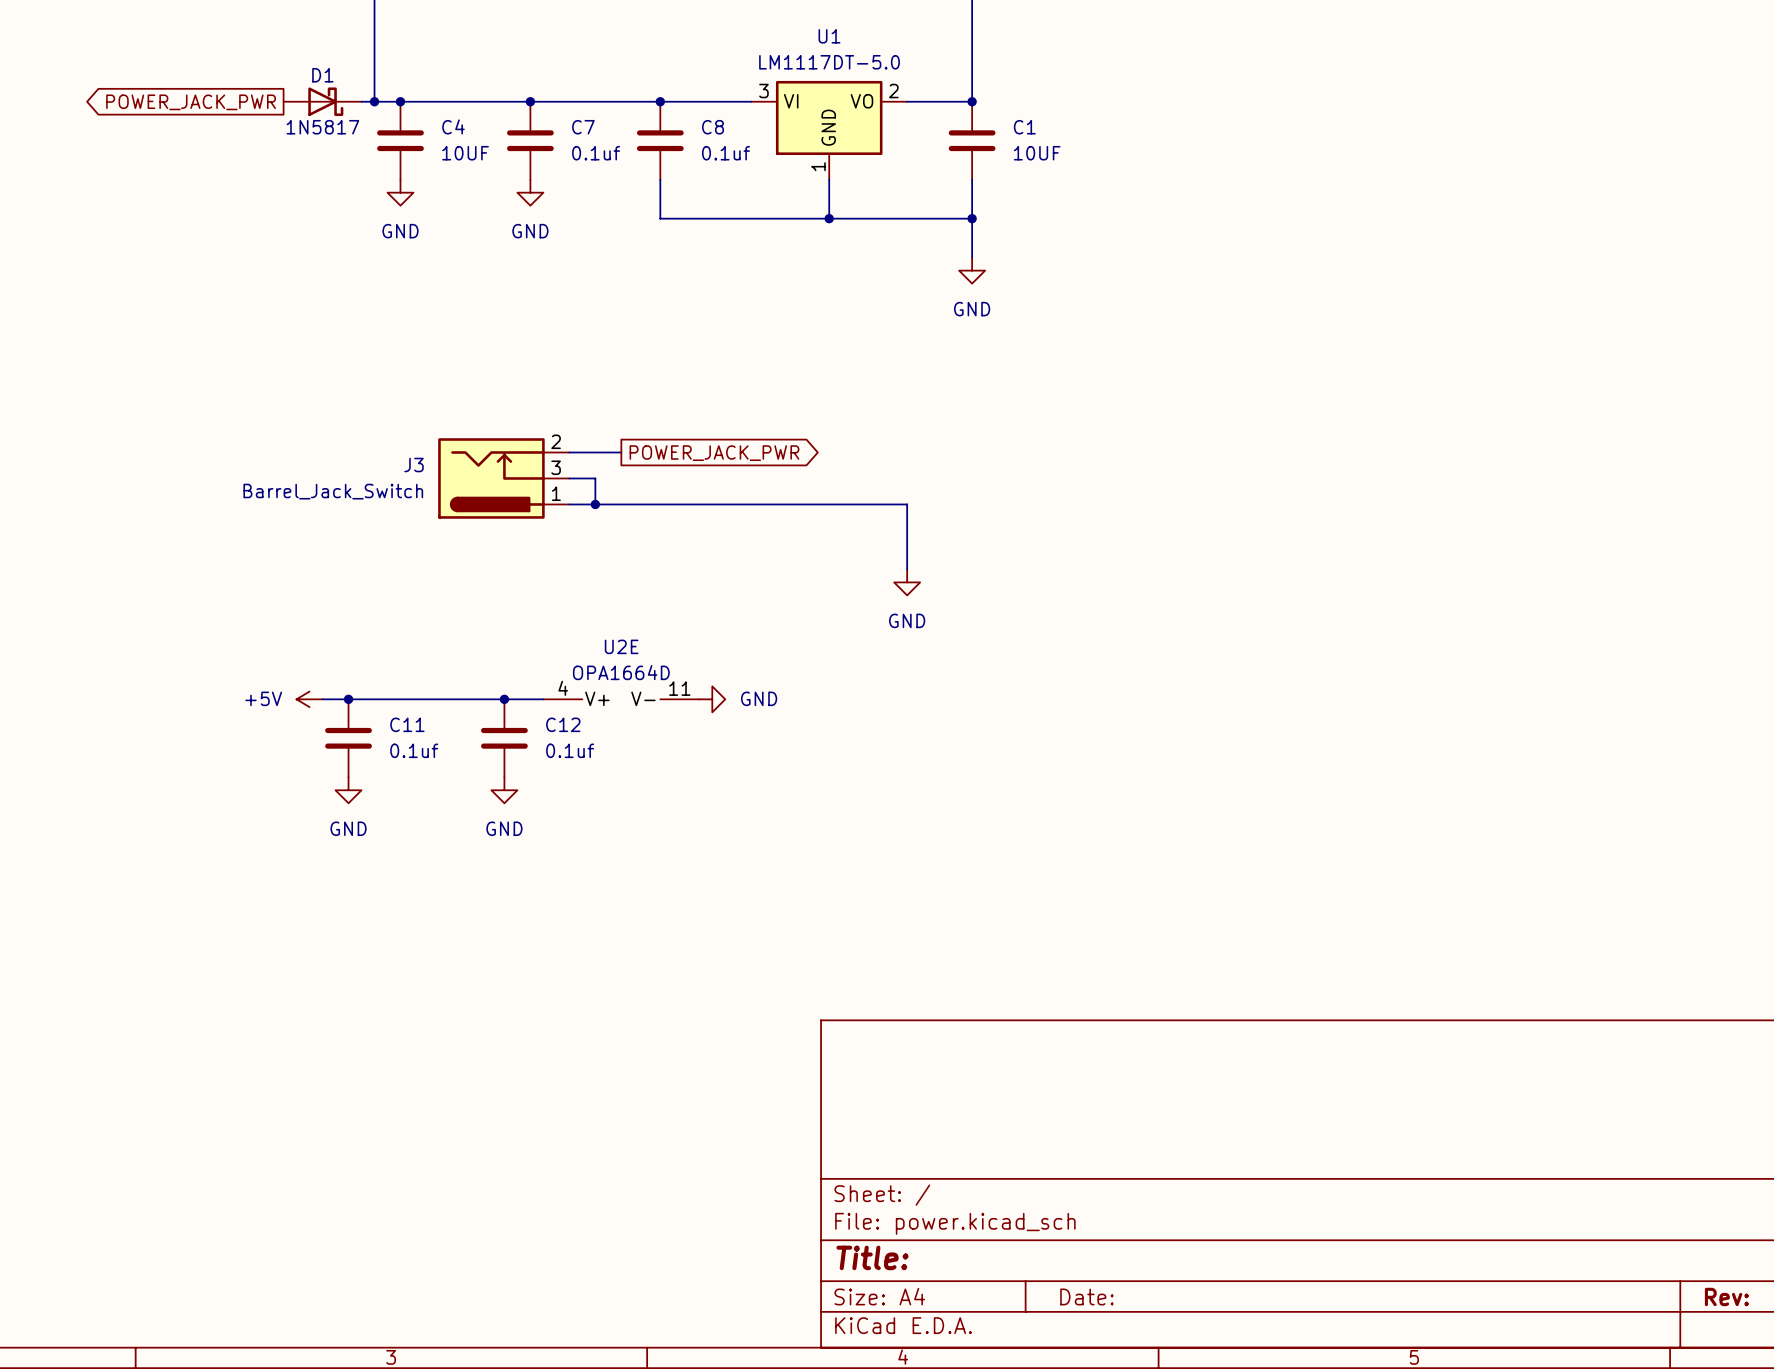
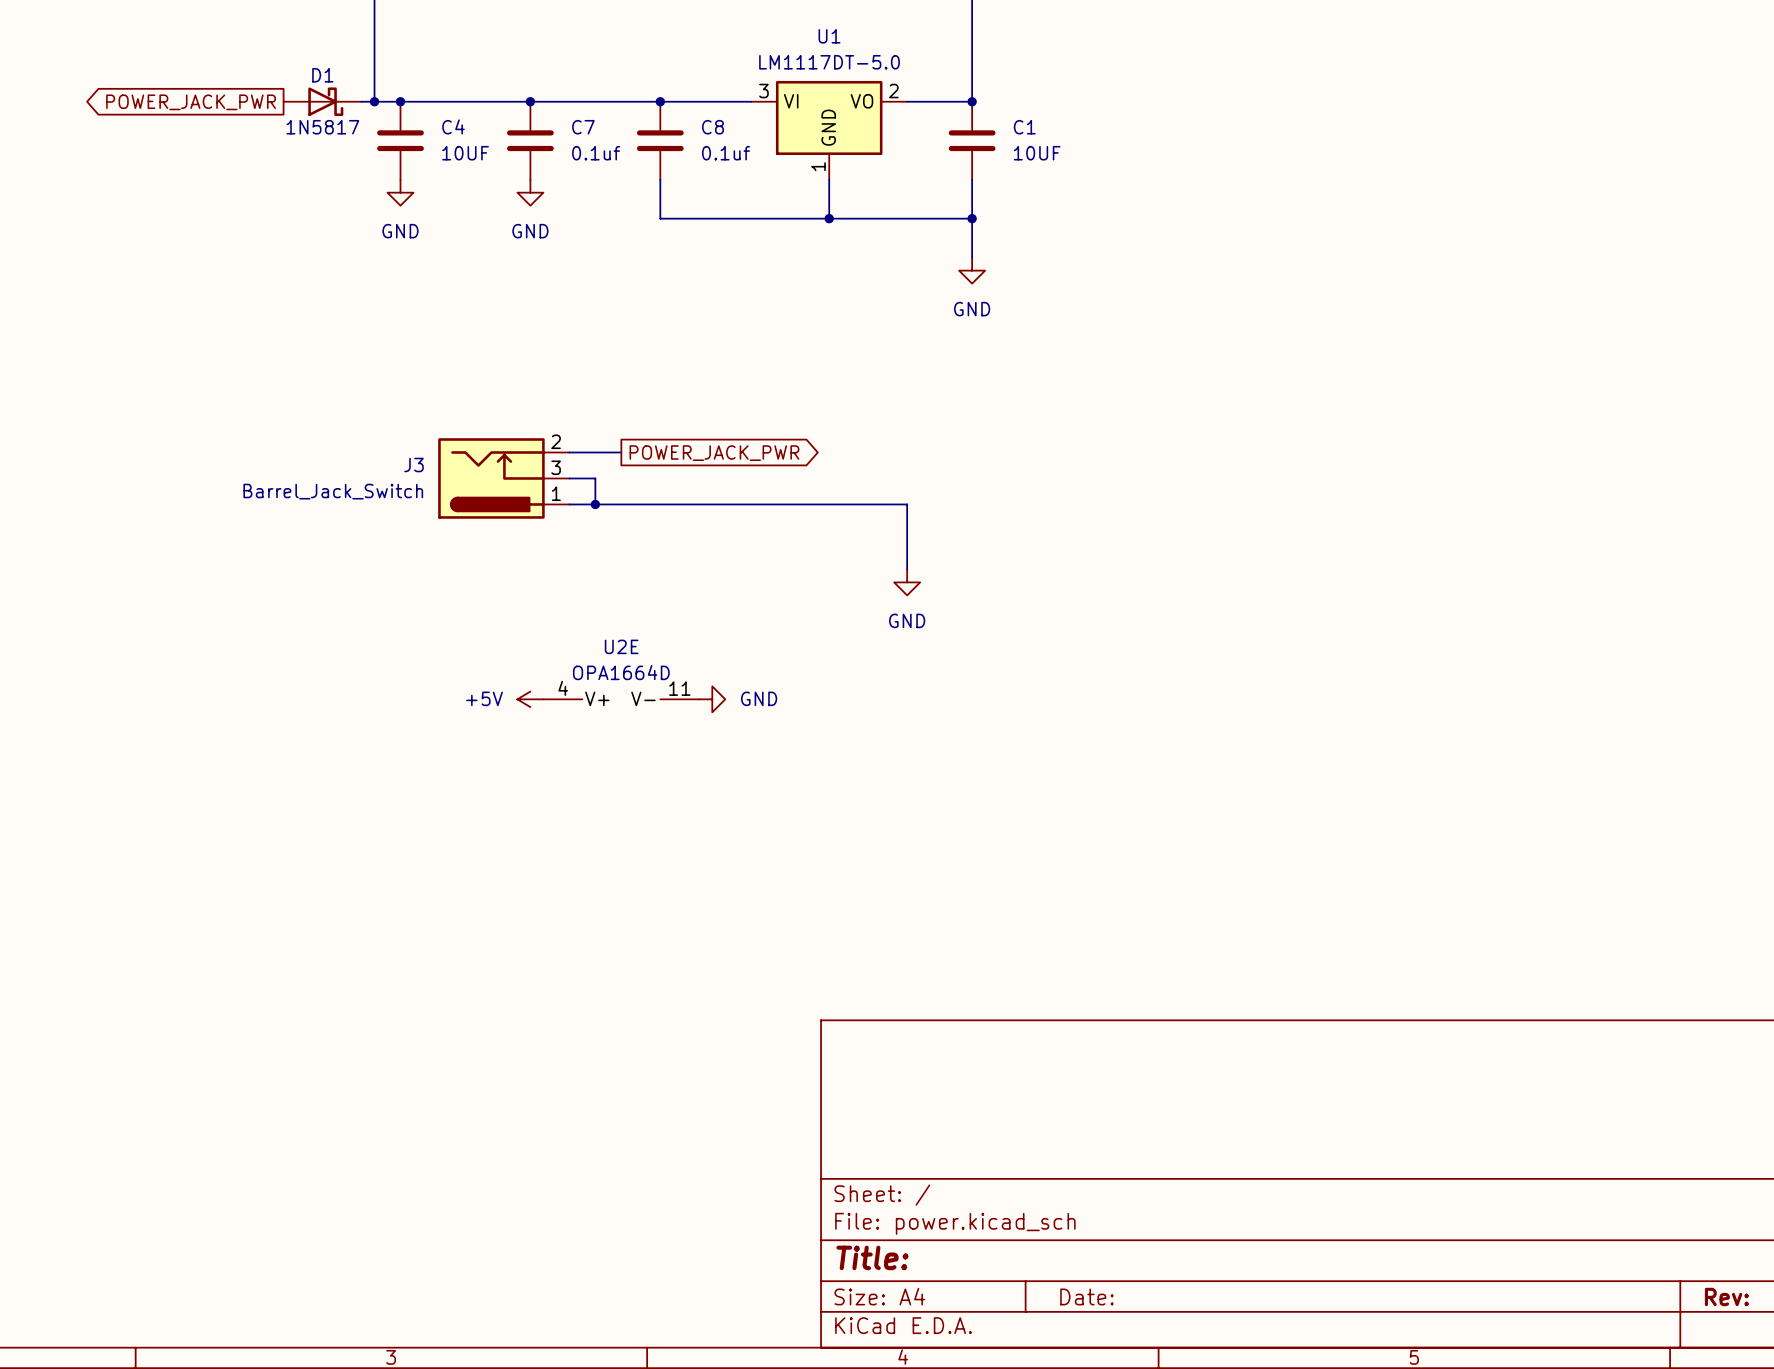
power symbol position: +5V (309, 699) -> +5V (530, 699)
wire: (322, 699) (543, 699) -> none
junction: (348, 699) -> none
junction: (504, 699) -> none
C11: 0.1uf (348, 738) -> none
C12: 0.1uf (504, 738) -> none
power symbol: GND (348, 790) -> none
power symbol: GND (504, 790) -> none

